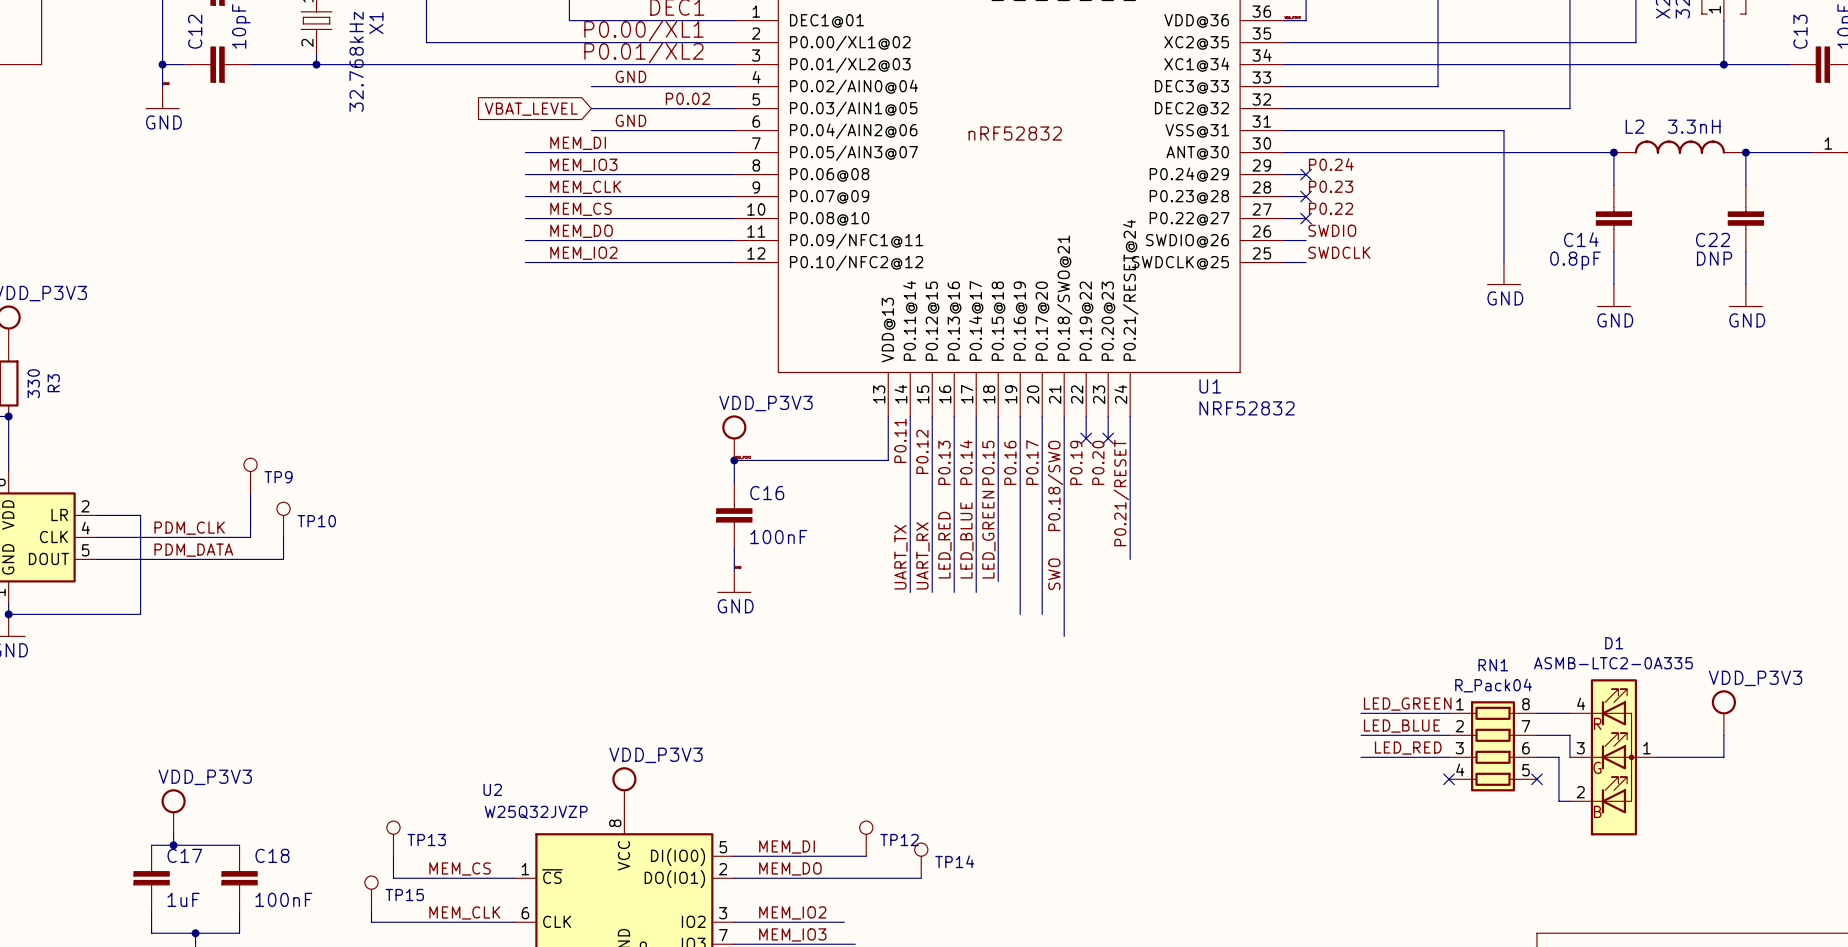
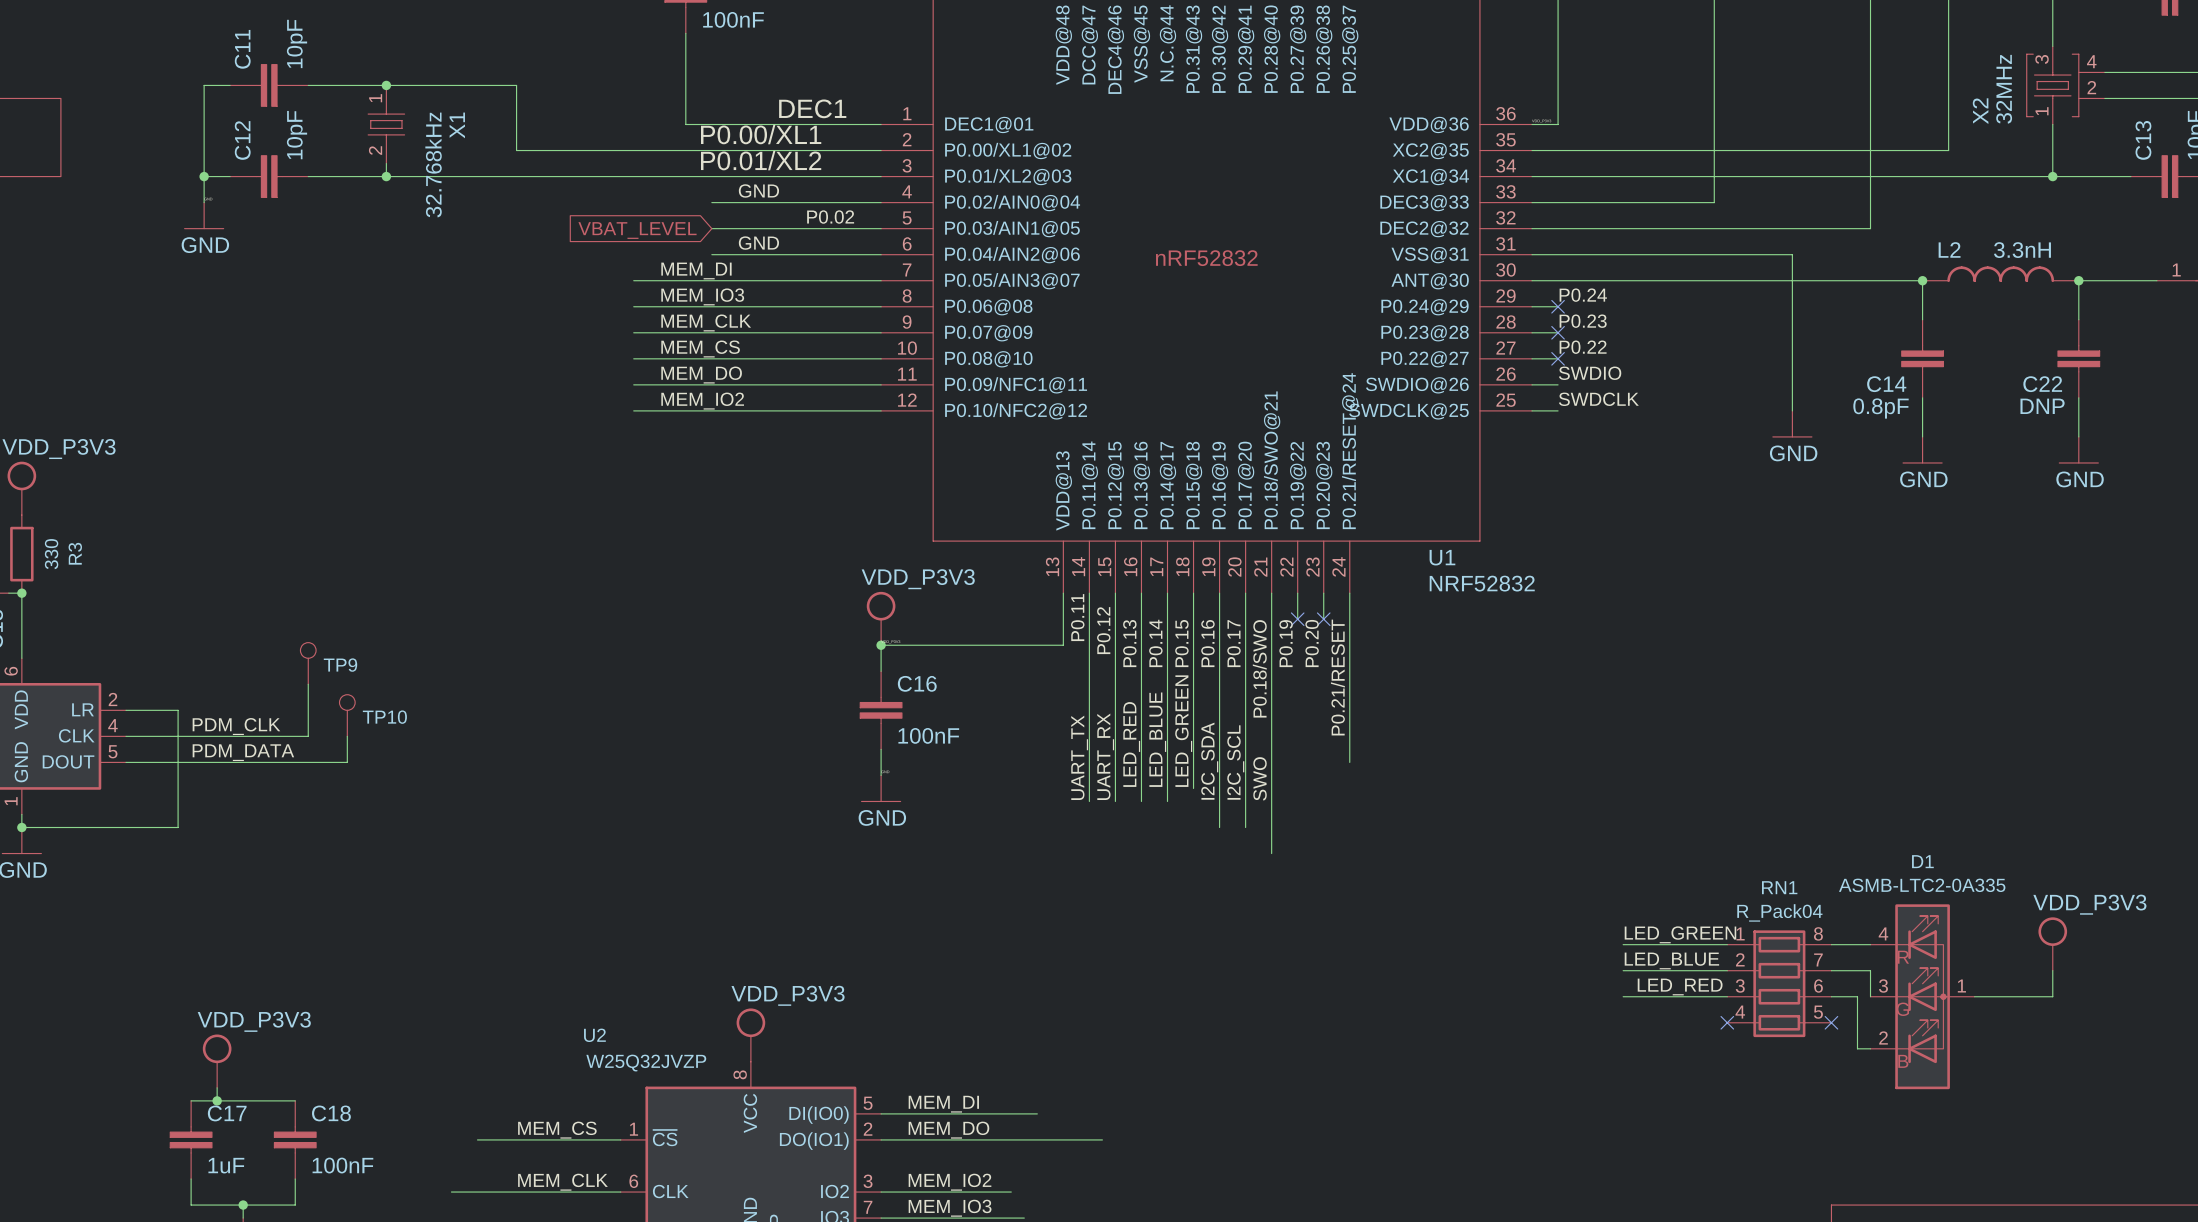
label: none -> I2C_SDA (1209, 761)
label: none -> I2C_SCL (1235, 762)
TP13: (393, 838) -> none
TP12: (866, 838) -> none
wire: (393, 856) (393, 878) -> none
TP14: (921, 860) -> none
TP15: (371, 893) -> none
wire: (371, 911) (371, 922) -> none

